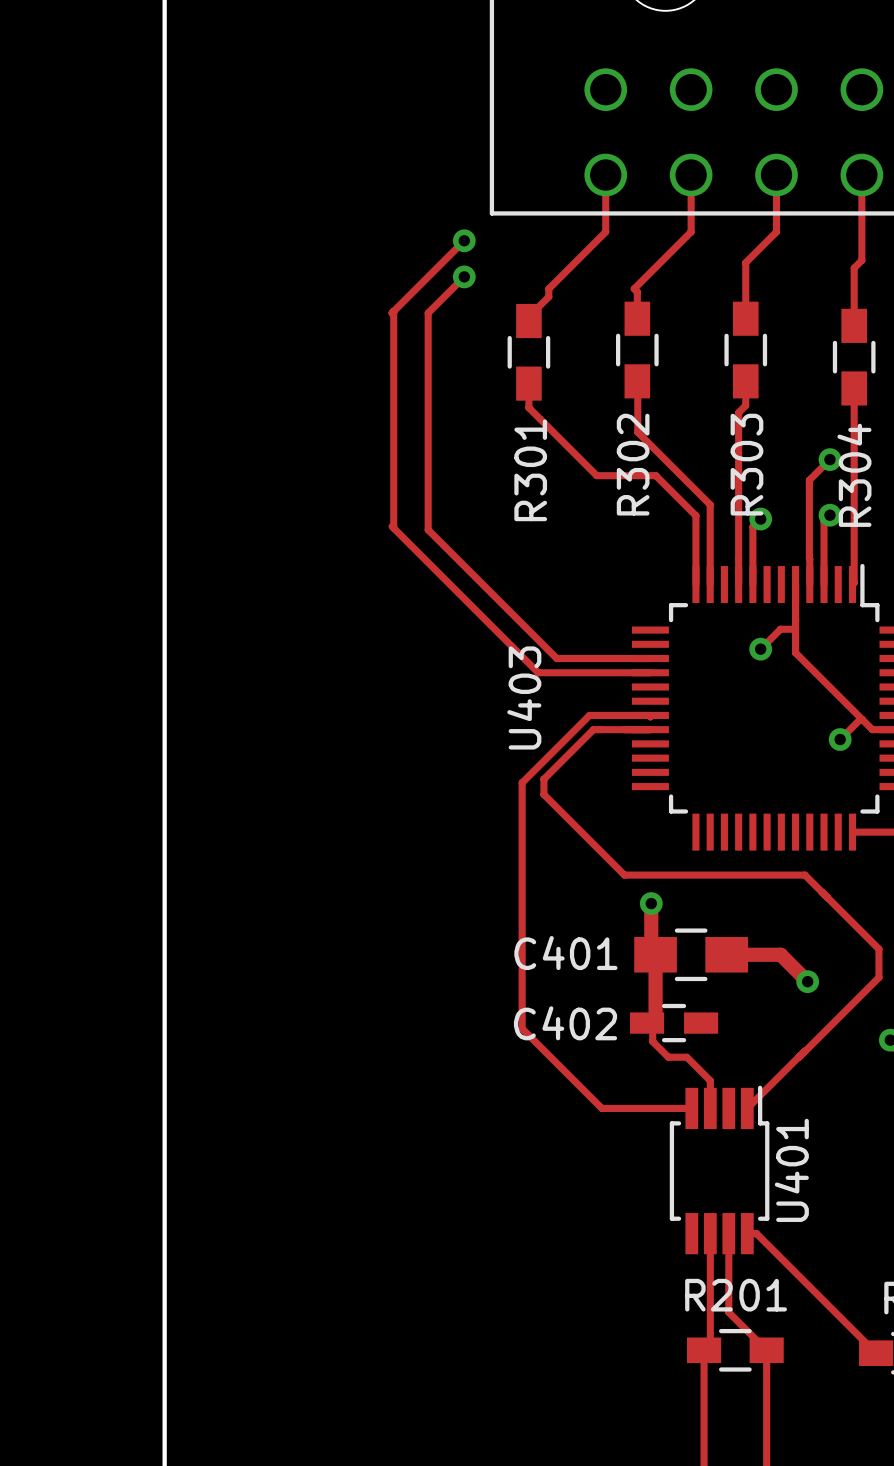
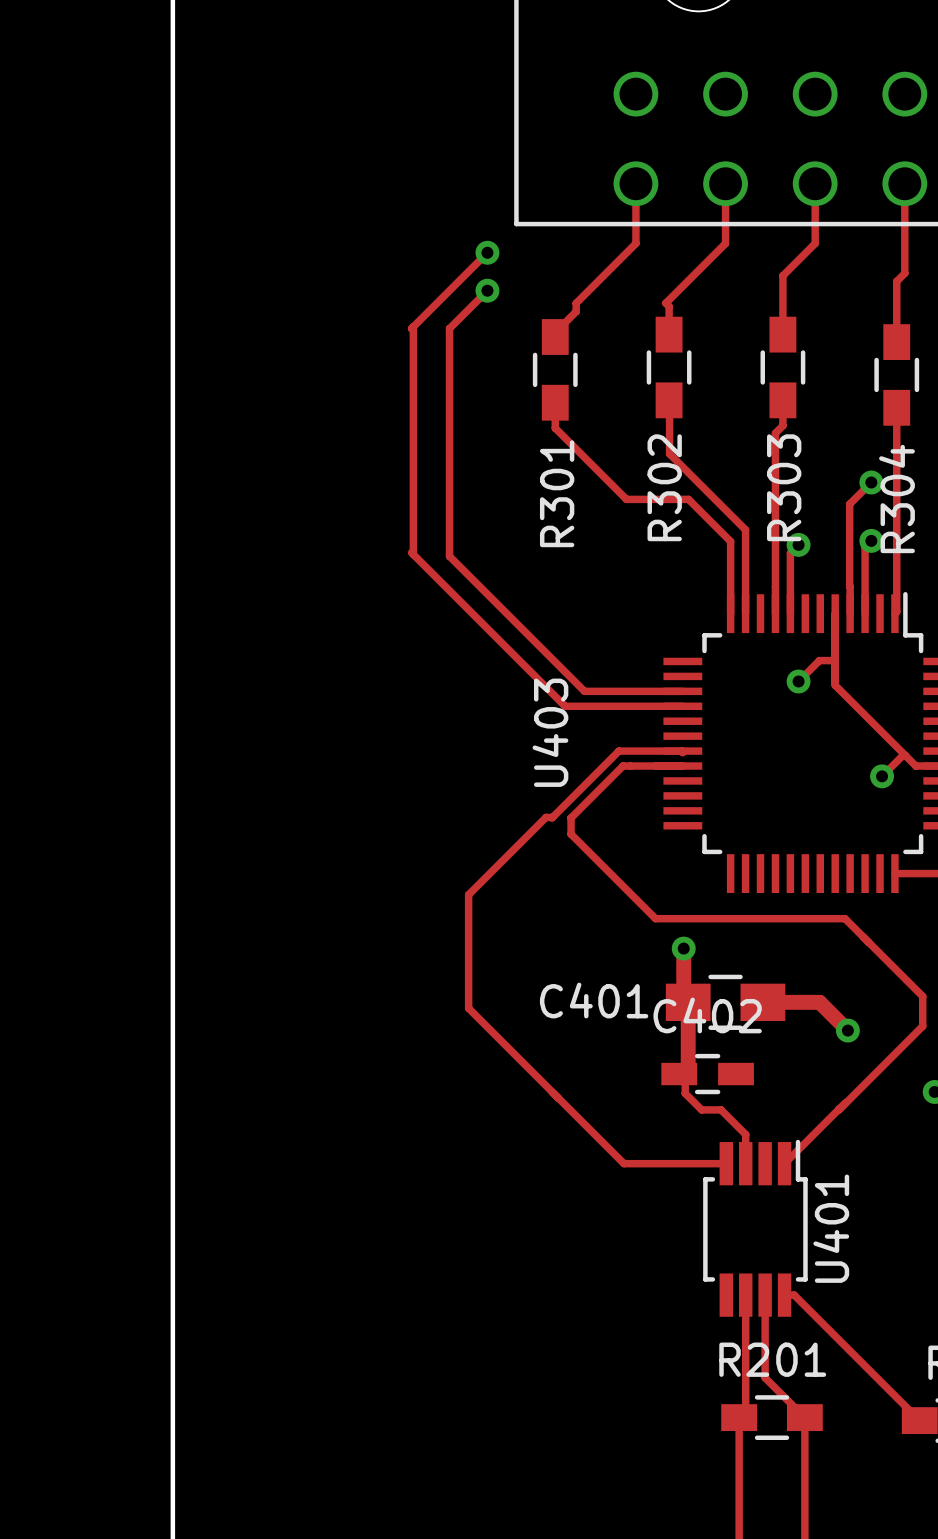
track: (525, 779) (522, 782) (522, 1028) (601, 1108) -> (552, 817) (546, 817) (468, 894) (468, 1008) (623, 1163) (631, 1163)
C402 name position: C402 (565, 1023) -> C402 (707, 1015)

